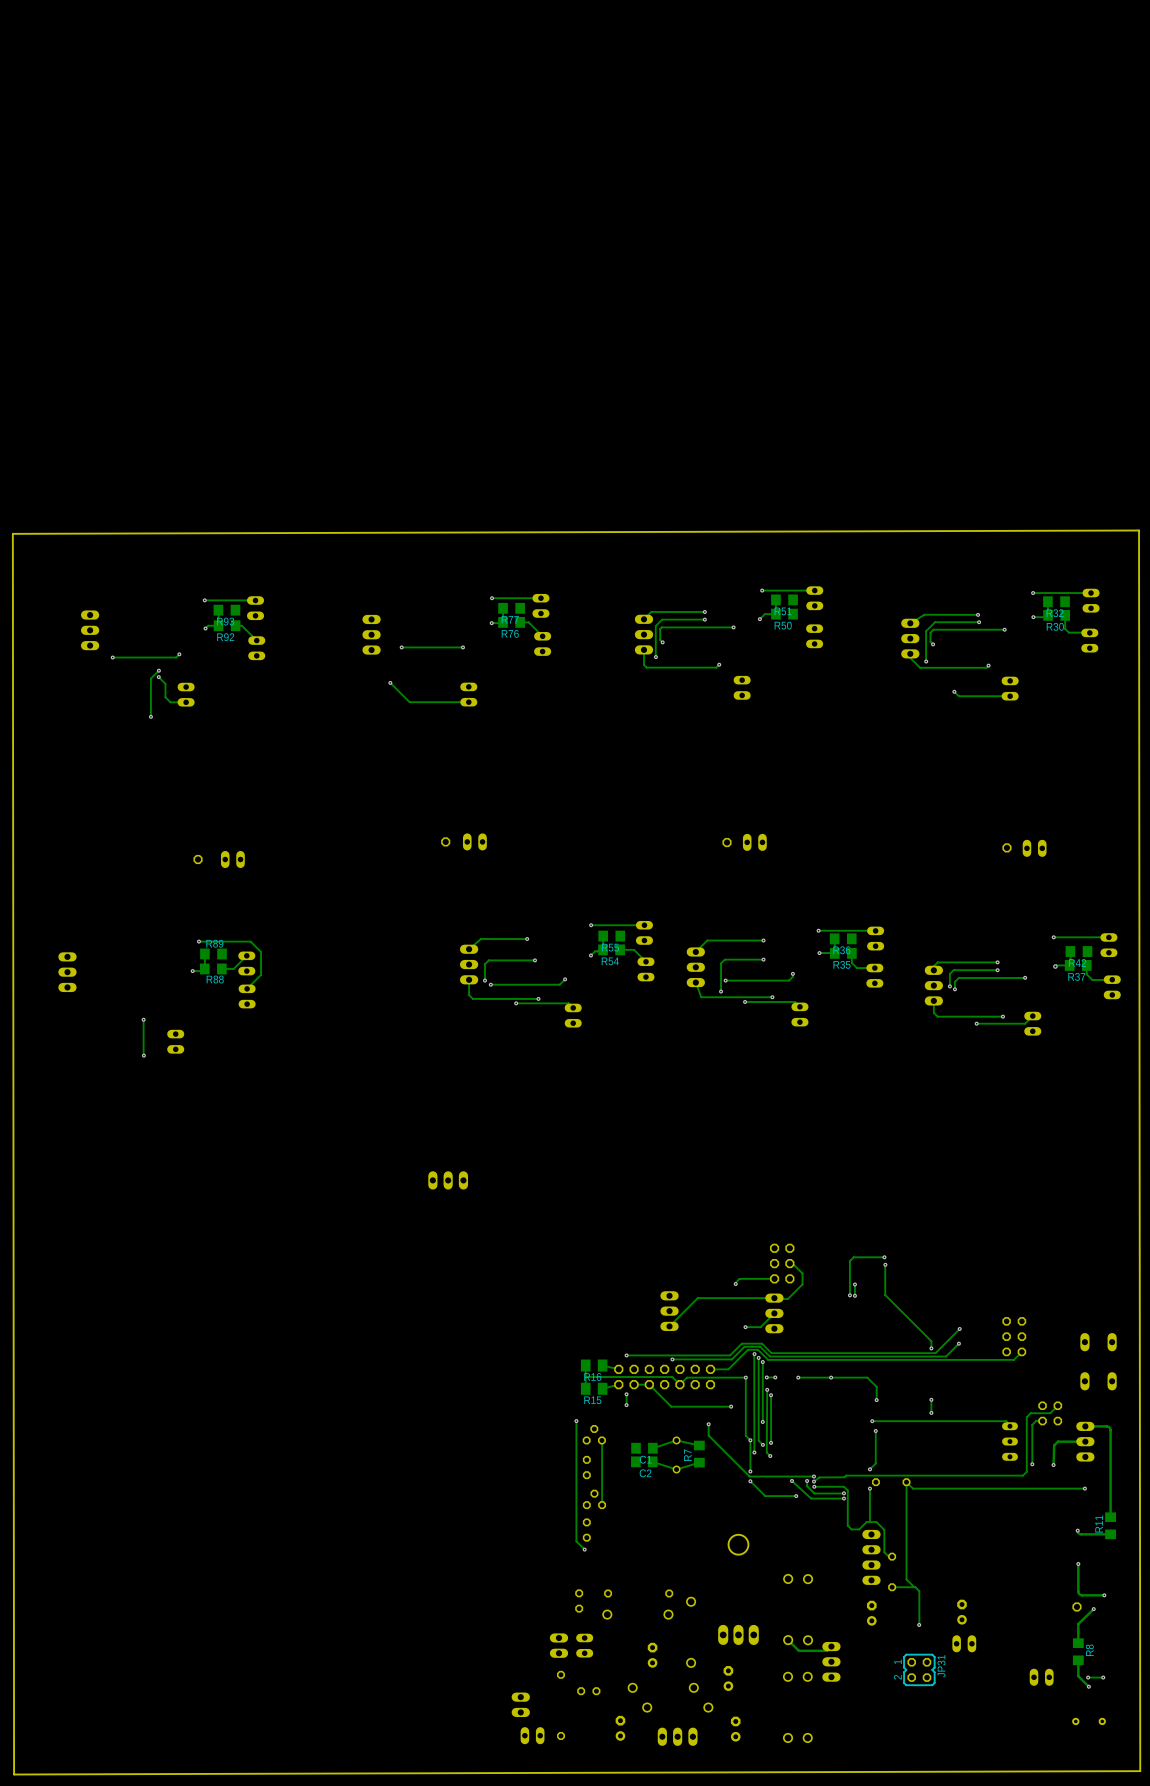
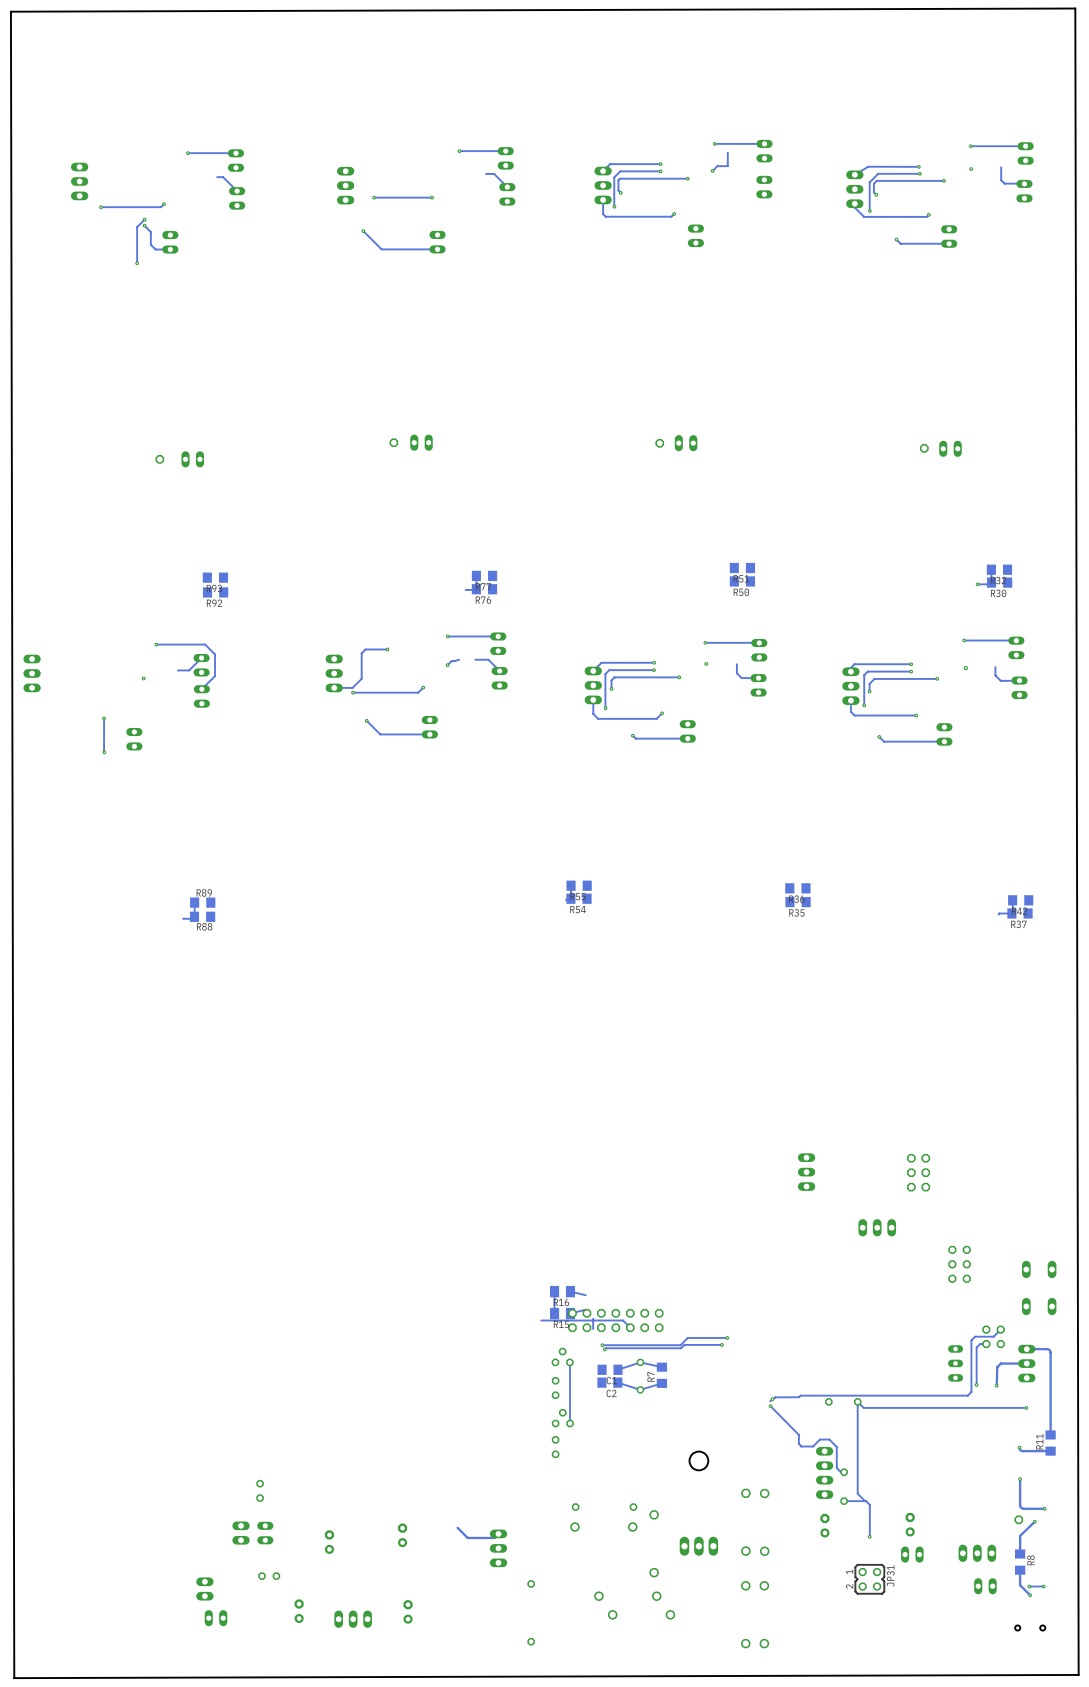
via: none -> (714, 143)
track: none -> (764, 143) (714, 143)
via: none -> (970, 146)
track: none -> (1025, 146) (970, 146)
via: none -> (459, 151)
track: none -> (505, 151) (459, 151)
part: none -> (764, 151)
track: none -> (187, 153) (235, 153)
via: none -> (187, 153)
track: none -> (727, 152) (727, 166) (717, 166) (712, 170)
part: none -> (1025, 153)
part: none -> (505, 158)
part: none -> (235, 160)
track: none -> (660, 164) (610, 164) (603, 171)
via: none -> (660, 164)
track: none -> (918, 166) (868, 166) (854, 174)
via: none -> (918, 166)
track: none -> (1001, 167) (1001, 180) (1004, 183) (1027, 183) (1024, 183)
via: none -> (971, 169)
via: none -> (712, 170)
track: none -> (660, 171) (620, 171) (614, 177) (614, 206)
via: none -> (660, 171)
track: none -> (486, 173) (494, 173) (507, 187)
track: none -> (919, 173) (878, 173) (869, 182) (869, 210)
via: none -> (919, 173)
track: none -> (217, 177) (223, 177) (237, 191)
track: none -> (687, 178) (619, 178) (618, 190) (620, 192)
via: none -> (687, 178)
part: none -> (79, 181)
track: none -> (943, 180) (876, 180) (873, 183) (873, 192) (876, 194)
via: none -> (943, 180)
part: none -> (345, 185)
part: none -> (603, 185)
part: none -> (764, 187)
part: none -> (854, 189)
part: none -> (1024, 191)
via: none -> (620, 192)
part: none -> (507, 194)
via: none -> (876, 194)
part: none -> (237, 198)
via: none -> (374, 197)
track: none -> (432, 197) (374, 197)
via: none -> (432, 197)
track: none -> (603, 199) (603, 214) (605, 216) (671, 216) (674, 213)
track: none -> (164, 204) (160, 207) (101, 207)
via: none -> (164, 204)
track: none -> (854, 203) (854, 207) (864, 216) (926, 216) (928, 214)
via: none -> (614, 206)
via: none -> (101, 207)
via: none -> (869, 210)
via: none -> (674, 213)
via: none -> (928, 214)
track: none -> (144, 219) (137, 227) (137, 263)
via: none -> (144, 219)
track: none -> (144, 225) (150, 232) (150, 244) (155, 249) (170, 249)
via: none -> (144, 225)
track: none -> (363, 231) (381, 249) (437, 249)
via: none -> (363, 231)
part: none -> (695, 235)
part: none -> (949, 236)
track: none -> (896, 239) (900, 243) (949, 243)
via: none -> (896, 239)
part: none -> (170, 242)
part: none -> (437, 242)
via: none -> (137, 263)
part: none -> (393, 442)
part: none -> (421, 442)
part: none -> (659, 443)
part: none -> (686, 443)
part: none -> (924, 448)
part: none -> (950, 448)
part: none -> (159, 459)
part: none -> (192, 459)
via: (762, 590) -> none
track: (814, 590) (762, 590) -> none
via: (1033, 593) -> none
track: (1091, 593) (1033, 593) -> none
via: (492, 598) -> none
track: (540, 598) (492, 598) -> none
part: (814, 598) -> none
track: (775, 599) (775, 614) (764, 614) (759, 619) -> none
track: (204, 600) (255, 600) -> none
via: (204, 600) -> none
part: (1091, 600) -> none
part: (540, 605) -> none
part: (255, 608) -> none
track: (218, 610) (218, 625) (208, 625) (205, 628) -> none
track: (704, 611) (651, 611) (643, 619) -> none
via: (704, 611) -> none
track: (978, 614) (924, 614) (910, 623) -> none
via: (978, 614) -> none
track: (1065, 615) (1065, 628) (1068, 632) (1093, 632) (1089, 632) -> none
track: (704, 619) (662, 619) (655, 626) (655, 657) -> none
via: (704, 619) -> none
via: (759, 619) -> none
track: (520, 622) (528, 622) (542, 636) -> none
track: (979, 622) (935, 622) (926, 631) (926, 661) -> none
via: (979, 622) -> none
via: (491, 623) -> none
track: (235, 625) (241, 625) (256, 640) -> none
track: (733, 627) (661, 627) (660, 639) (662, 642) -> none
via: (733, 627) -> none
via: (205, 628) -> none
track: (1004, 629) (933, 629) (930, 632) (930, 641) (933, 644) -> none
via: (1004, 629) -> none
part position: (90, 630) -> (32, 673)
part position: (371, 634) -> (334, 673)
part position: (643, 634) -> (593, 685)
part: (814, 636) -> none
part position: (910, 638) -> (850, 686)
part: (1089, 640) -> none
via: (662, 642) -> none
part: (542, 643) -> none
via: (933, 644) -> none
via: (401, 647) -> none
track: (462, 647) (401, 647) -> none
via: (462, 647) -> none
part: (256, 648) -> none
track: (643, 649) (643, 664) (646, 667) (716, 667) (719, 664) -> none
track: (910, 653) (910, 657) (920, 667) (986, 667) (988, 665) -> none
track: (179, 654) (176, 657) (112, 657) -> none
via: (179, 654) -> none
via: (112, 657) -> none
via: (655, 657) -> none
via: (926, 661) -> none
via: (719, 664) -> none
via: (988, 665) -> none
track: (158, 670) (150, 678) (150, 716) -> none
via: (158, 670) -> none
via: none -> (447, 636)
track: none -> (498, 636) (447, 636)
track: none -> (964, 640) (1016, 640)
via: none -> (964, 640)
track: (158, 677) (165, 683) (165, 697) (170, 702) (186, 702) -> none
via: (158, 677) -> none
track: none -> (705, 642) (759, 642)
via: none -> (705, 642)
track: none -> (156, 644) (205, 644) (215, 654) (215, 676) (201, 689)
via: none -> (156, 644)
part: none -> (498, 643)
track: (390, 682) (409, 702) (468, 702) -> none
via position: (390, 682) -> (387, 649)
part: none -> (1016, 647)
track: none -> (387, 649) (365, 649) (361, 653) (361, 678) (352, 687) (334, 687)
part: none -> (759, 650)
part: (742, 687) -> none
part: (1010, 688) -> none
track: (954, 691) (958, 696) (1010, 696) -> none
via: (954, 691) -> none
part: (186, 694) -> none
part: (468, 694) -> none
track: none -> (201, 658) (189, 670) (178, 670)
track: none -> (459, 659) (451, 661) (447, 665)
track: none -> (475, 659) (488, 659) (499, 671)
track: none -> (654, 662) (601, 662) (593, 671)
via: none -> (654, 662)
via: none -> (706, 663)
track: none -> (736, 664) (736, 673) (741, 678) (758, 678)
track: none -> (911, 664) (854, 664) (850, 667) (850, 671)
via: none -> (911, 664)
part: none -> (201, 665)
via: none -> (447, 665)
track: none -> (995, 667) (995, 675) (1000, 680) (1019, 680)
via: none -> (965, 668)
track: none -> (653, 670) (609, 670) (605, 674) (605, 708)
via: none -> (653, 670)
track: none -> (911, 671) (867, 671) (864, 675) (864, 705)
via: none -> (911, 671)
track: none -> (679, 677) (614, 677) (611, 680) (611, 688)
via: none -> (679, 677)
part: none -> (499, 678)
track: none -> (937, 678) (874, 678) (869, 683) (869, 691)
via: none -> (937, 678)
part: none -> (758, 685)
track: none -> (423, 687) (418, 692) (353, 692)
via: none -> (423, 687)
part: none -> (1019, 687)
via: none -> (611, 688)
via: none -> (869, 691)
via: none -> (353, 692)
part: none -> (201, 696)
track: none -> (593, 699) (593, 713) (598, 718) (656, 718) (662, 713)
track: none -> (850, 700) (850, 711) (854, 715) (916, 715)
via: none -> (864, 705)
via: none -> (605, 708)
via: none -> (662, 713)
via: none -> (916, 715)
track: none -> (104, 718) (104, 752)
via: none -> (104, 718)
track: none -> (366, 720) (380, 734) (429, 734)
via: none -> (366, 720)
part: none -> (429, 727)
part: none -> (687, 731)
part: none -> (944, 734)
track: none -> (632, 735) (635, 738) (687, 738)
via: none -> (632, 735)
track: none -> (879, 736) (884, 741) (944, 741)
via: none -> (879, 736)
part: none -> (134, 739)
via: none -> (104, 752)
part: (445, 841) -> none
part: (474, 841) -> none
part: (727, 842) -> none
part: (754, 842) -> none
part: (1006, 847) -> none
part: (1034, 848) -> none
part: (198, 859) -> none
part: (232, 859) -> none
via: (591, 925) -> none
track: (644, 925) (591, 925) -> none
track: (818, 930) (875, 930) -> none
via: (818, 930) -> none
part: (644, 932) -> none
track: (1053, 937) (1108, 937) -> none
via: (1053, 937) -> none
track: (527, 938) (481, 938) (469, 949) -> none
via: (527, 938) -> none
track: (834, 938) (834, 953) (819, 953) -> none
part: (875, 938) -> none
track: (763, 940) (707, 940) (695, 951) -> none
via: (763, 940) -> none
track: (198, 941) (250, 941) (261, 951) (261, 974) (247, 988) -> none
via: (198, 941) -> none
part: (1108, 945) -> none
track: (603, 949) (595, 951) (590, 955) -> none
track: (620, 949) (634, 949) (645, 961) -> none
via: (819, 953) -> none
track: (851, 953) (851, 962) (856, 968) (874, 968) -> none
track: (246, 955) (233, 968) (221, 968) -> none
via: (590, 955) -> none
track: (763, 959) (724, 959) (721, 963) (721, 991) -> none
via: (763, 959) -> none
track: (534, 960) (488, 960) (485, 964) (485, 980) -> none
via: (534, 960) -> none
track: (997, 962) (937, 962) (933, 966) (933, 970) -> none
via: (997, 962) -> none
part: (246, 963) -> none
part: (469, 964) -> none
track: (1086, 965) (1086, 974) (1092, 979) (1112, 979) -> none
via: (1055, 966) -> none
part: (695, 967) -> none
part: (645, 969) -> none
track: (997, 970) (953, 970) (949, 974) (949, 986) -> none
via: (997, 970) -> none
via: (192, 971) -> none
part: (67, 972) -> none
track: (792, 973) (789, 980) (725, 980) -> none
via: (792, 973) -> none
part: (874, 975) -> none
track: (1025, 977) (958, 977) (954, 981) (954, 989) -> none
via: (1025, 977) -> none
track: (469, 979) (469, 995) (472, 998) (538, 998) -> none
track: (565, 979) (559, 984) (490, 984) -> none
via: (565, 979) -> none
via: (485, 980) -> none
via: (725, 980) -> none
track: (695, 982) (701, 997) (772, 997) -> none
via: (490, 984) -> none
part: (933, 985) -> none
via: (949, 986) -> none
part: (1112, 987) -> none
via: (954, 989) -> none
via: (721, 991) -> none
part: (247, 996) -> none
via: (772, 997) -> none
via: (538, 998) -> none
track: (933, 1000) (933, 1012) (937, 1016) (1002, 1016) -> none
track: (745, 1001) (795, 1001) (799, 1006) -> none
via: (745, 1001) -> none
track: (516, 1003) (568, 1003) (573, 1007) -> none
via: (516, 1003) -> none
part: (799, 1014) -> none
part: (573, 1015) -> none
via: (1002, 1016) -> none
track: (1032, 1016) (1025, 1023) (976, 1023) -> none
track: (143, 1019) (143, 1055) -> none
via: (143, 1019) -> none
via: (976, 1023) -> none
part: (1032, 1023) -> none
part: (175, 1041) -> none
via: (143, 1055) -> none
part: (448, 1180) -> none
part: none -> (806, 1172)
part: none -> (918, 1172)
track: (884, 1257) (853, 1257) (849, 1261) (849, 1295) -> none
via: (884, 1257) -> none
part: (782, 1263) -> none
track: (789, 1263) (792, 1263) (802, 1273) (802, 1284) (787, 1299) (697, 1298) (669, 1326) -> none
track: (885, 1264) (885, 1295) (931, 1341) (931, 1348) -> none
via: (885, 1264) -> none
track: (774, 1278) (739, 1278) (735, 1284) -> none
via: (735, 1284) -> none
track: (854, 1284) (854, 1295) -> none
via: (854, 1284) -> none
via: (849, 1295) -> none
via: (854, 1295) -> none
part: none -> (877, 1227)
part: (669, 1311) -> none
track: (774, 1313) (760, 1327) (745, 1327) -> none
part: (774, 1313) -> none
via: (745, 1327) -> none
track: (959, 1329) (935, 1353) (771, 1353) (762, 1343) (741, 1343) (730, 1355) (626, 1355) -> none
via: (959, 1329) -> none
track: (958, 1343) (946, 1356) (769, 1356) (760, 1346) (744, 1346) (731, 1359) (672, 1359) -> none
via: (958, 1343) -> none
via: (931, 1348) -> none
track: (1021, 1351) (1013, 1359) (768, 1359) (758, 1349) (747, 1349) (728, 1369) (710, 1369) -> none
track: (754, 1354) (754, 1452) -> none
via: (754, 1354) -> none
via: (626, 1355) -> none
track: (758, 1357) (758, 1440) (762, 1444) -> none
via: (758, 1357) -> none
via: (672, 1359) -> none
track: (762, 1362) (762, 1421) -> (604, 1349) (681, 1348) (684, 1344) (722, 1344)
via: (762, 1362) -> none
track: (585, 1377) (672, 1377) (679, 1384) (686, 1377) (745, 1377) (745, 1435) (750, 1440) -> none
part position: (664, 1377) -> (615, 1320)
via: (745, 1377) -> none
via: (766, 1377) -> none
track: (775, 1377) (766, 1377) -> none
via: (775, 1377) -> none
track: (798, 1377) (867, 1377) (876, 1386) (876, 1400) -> none
via: (798, 1377) -> none
via: (831, 1377) -> none
track: (634, 1384) (649, 1384) (671, 1406) (731, 1406) -> none
track: (767, 1389) (766, 1452) (770, 1456) -> none
via: (767, 1389) -> none
via: (626, 1394) -> none
track: (771, 1395) (771, 1442) -> none
via: (771, 1395) -> none
track: none -> (541, 1320) (623, 1320) (630, 1327)
track: (931, 1399) (931, 1412) -> none
via: (931, 1399) -> none
via: (876, 1400) -> none
via: (626, 1405) -> none
via: (731, 1406) -> none
via: (931, 1412) -> none
track: none -> (727, 1337) (687, 1337) (680, 1345) (602, 1345)
via: none -> (727, 1337)
track: (576, 1421) (576, 1541) (584, 1549) -> none
via: (576, 1421) -> none
track: (872, 1421) (1006, 1421) (1010, 1426) -> none
via: (872, 1421) -> none
via: none -> (602, 1345)
track: (708, 1424) (708, 1435) (749, 1476) (814, 1476) -> none
via: (708, 1424) -> none
via: none -> (604, 1349)
track: (875, 1430) (875, 1463) (869, 1469) -> none
via: (875, 1430) -> none
track: (750, 1440) (750, 1471) -> none
via: (750, 1440) -> none
via: (771, 1442) -> none
via: (762, 1444) -> none
via: (754, 1452) -> none
via: (770, 1456) -> none
via: (869, 1469) -> none
via: (750, 1471) -> none
via: (814, 1476) -> none
via: none -> (772, 1399)
track: (791, 1480) (811, 1498) (843, 1498) -> none
via: (791, 1480) -> none
track: (807, 1480) (807, 1486) (814, 1493) (843, 1493) -> none
via: (807, 1480) -> none
track: (750, 1481) (765, 1496) (796, 1496) -> none
via: (750, 1481) -> none
via: (814, 1481) -> none
track: (814, 1486) (843, 1486) (847, 1490) (847, 1525) (851, 1529) -> (770, 1406) (798, 1434) (798, 1443) (801, 1446) (805, 1446)
track: (869, 1488) (870, 1522) -> none
via: (869, 1488) -> none
via: (843, 1493) -> none
via: (796, 1496) -> none
via: (843, 1498) -> none
via: (584, 1549) -> none
part: none -> (260, 1490)
part: (579, 1600) -> none
track: none -> (457, 1527) (467, 1537) (494, 1537) (498, 1533)
part: none -> (241, 1533)
part: none -> (265, 1533)
part: none -> (402, 1535)
part: none -> (329, 1542)
part: none -> (498, 1548)
track: (788, 1640) (798, 1650) (827, 1650) (831, 1646) -> none
part: none -> (977, 1553)
part: (558, 1645) -> none
part: (584, 1645) -> none
part: (652, 1655) -> none
part: (831, 1661) -> none
part: none -> (269, 1576)
part: (728, 1678) -> none
part: none -> (204, 1588)
part: (588, 1691) -> none
part: none -> (299, 1611)
part: none -> (408, 1611)
part: (520, 1704) -> none
part: none -> (216, 1618)
part: none -> (353, 1619)
part: (620, 1728) -> none
part: (735, 1729) -> none
part: (532, 1735) -> none
part: (677, 1736) -> none
board edge: (1140, 1771) (1139, 530) (12, 533) (14, 1774) -> (1078, 1674) (1075, 8) (10, 11) (14, 1678)

